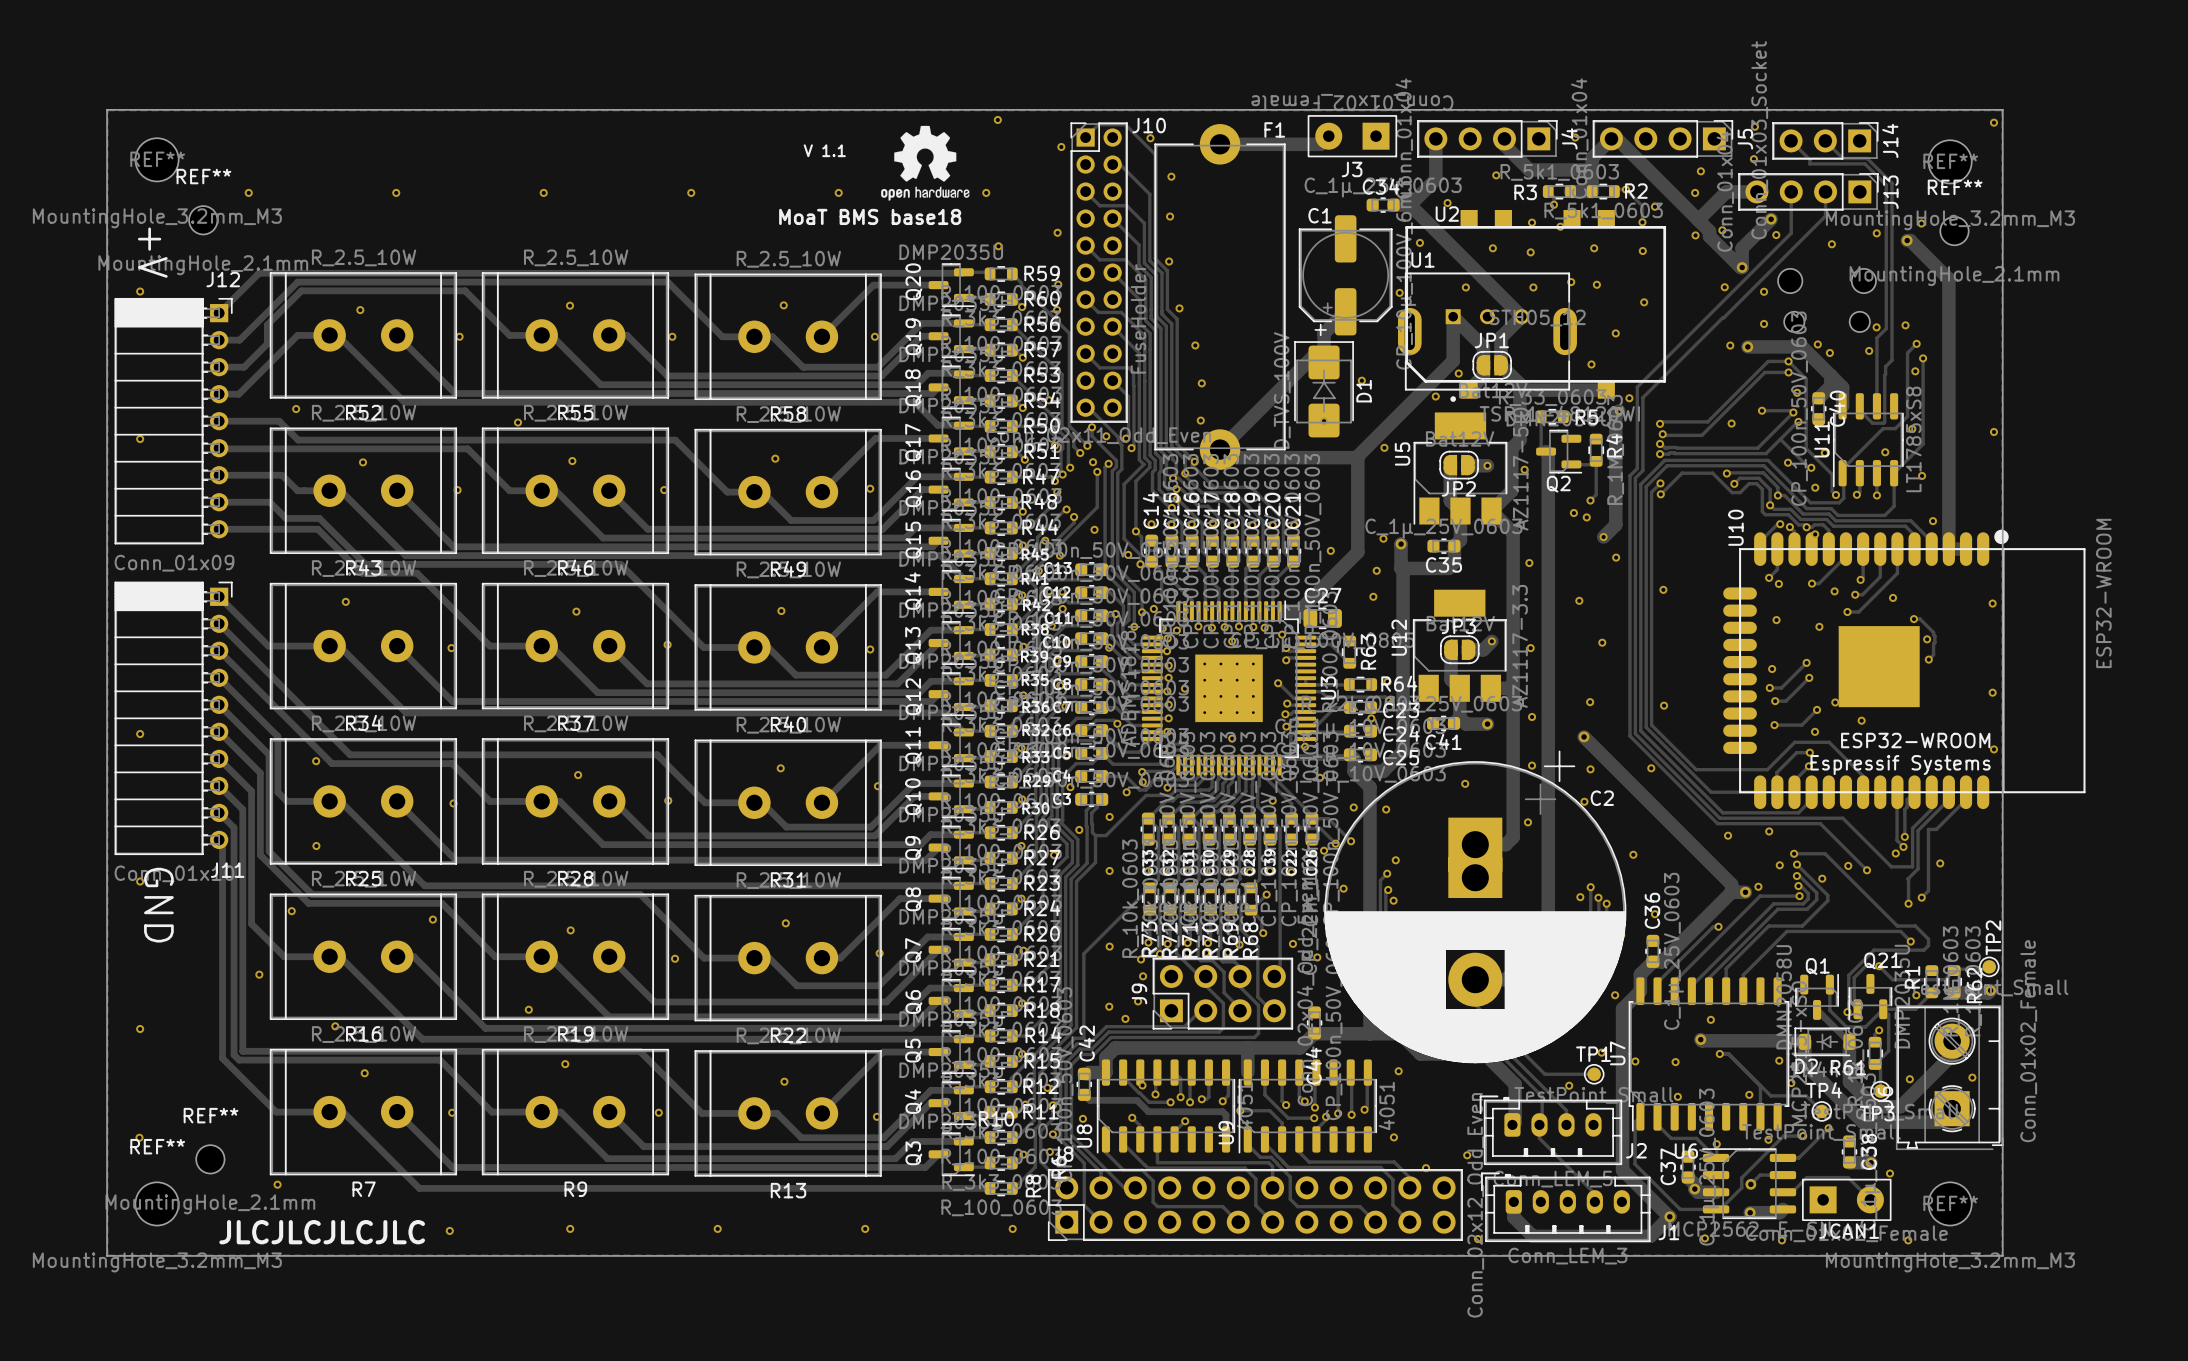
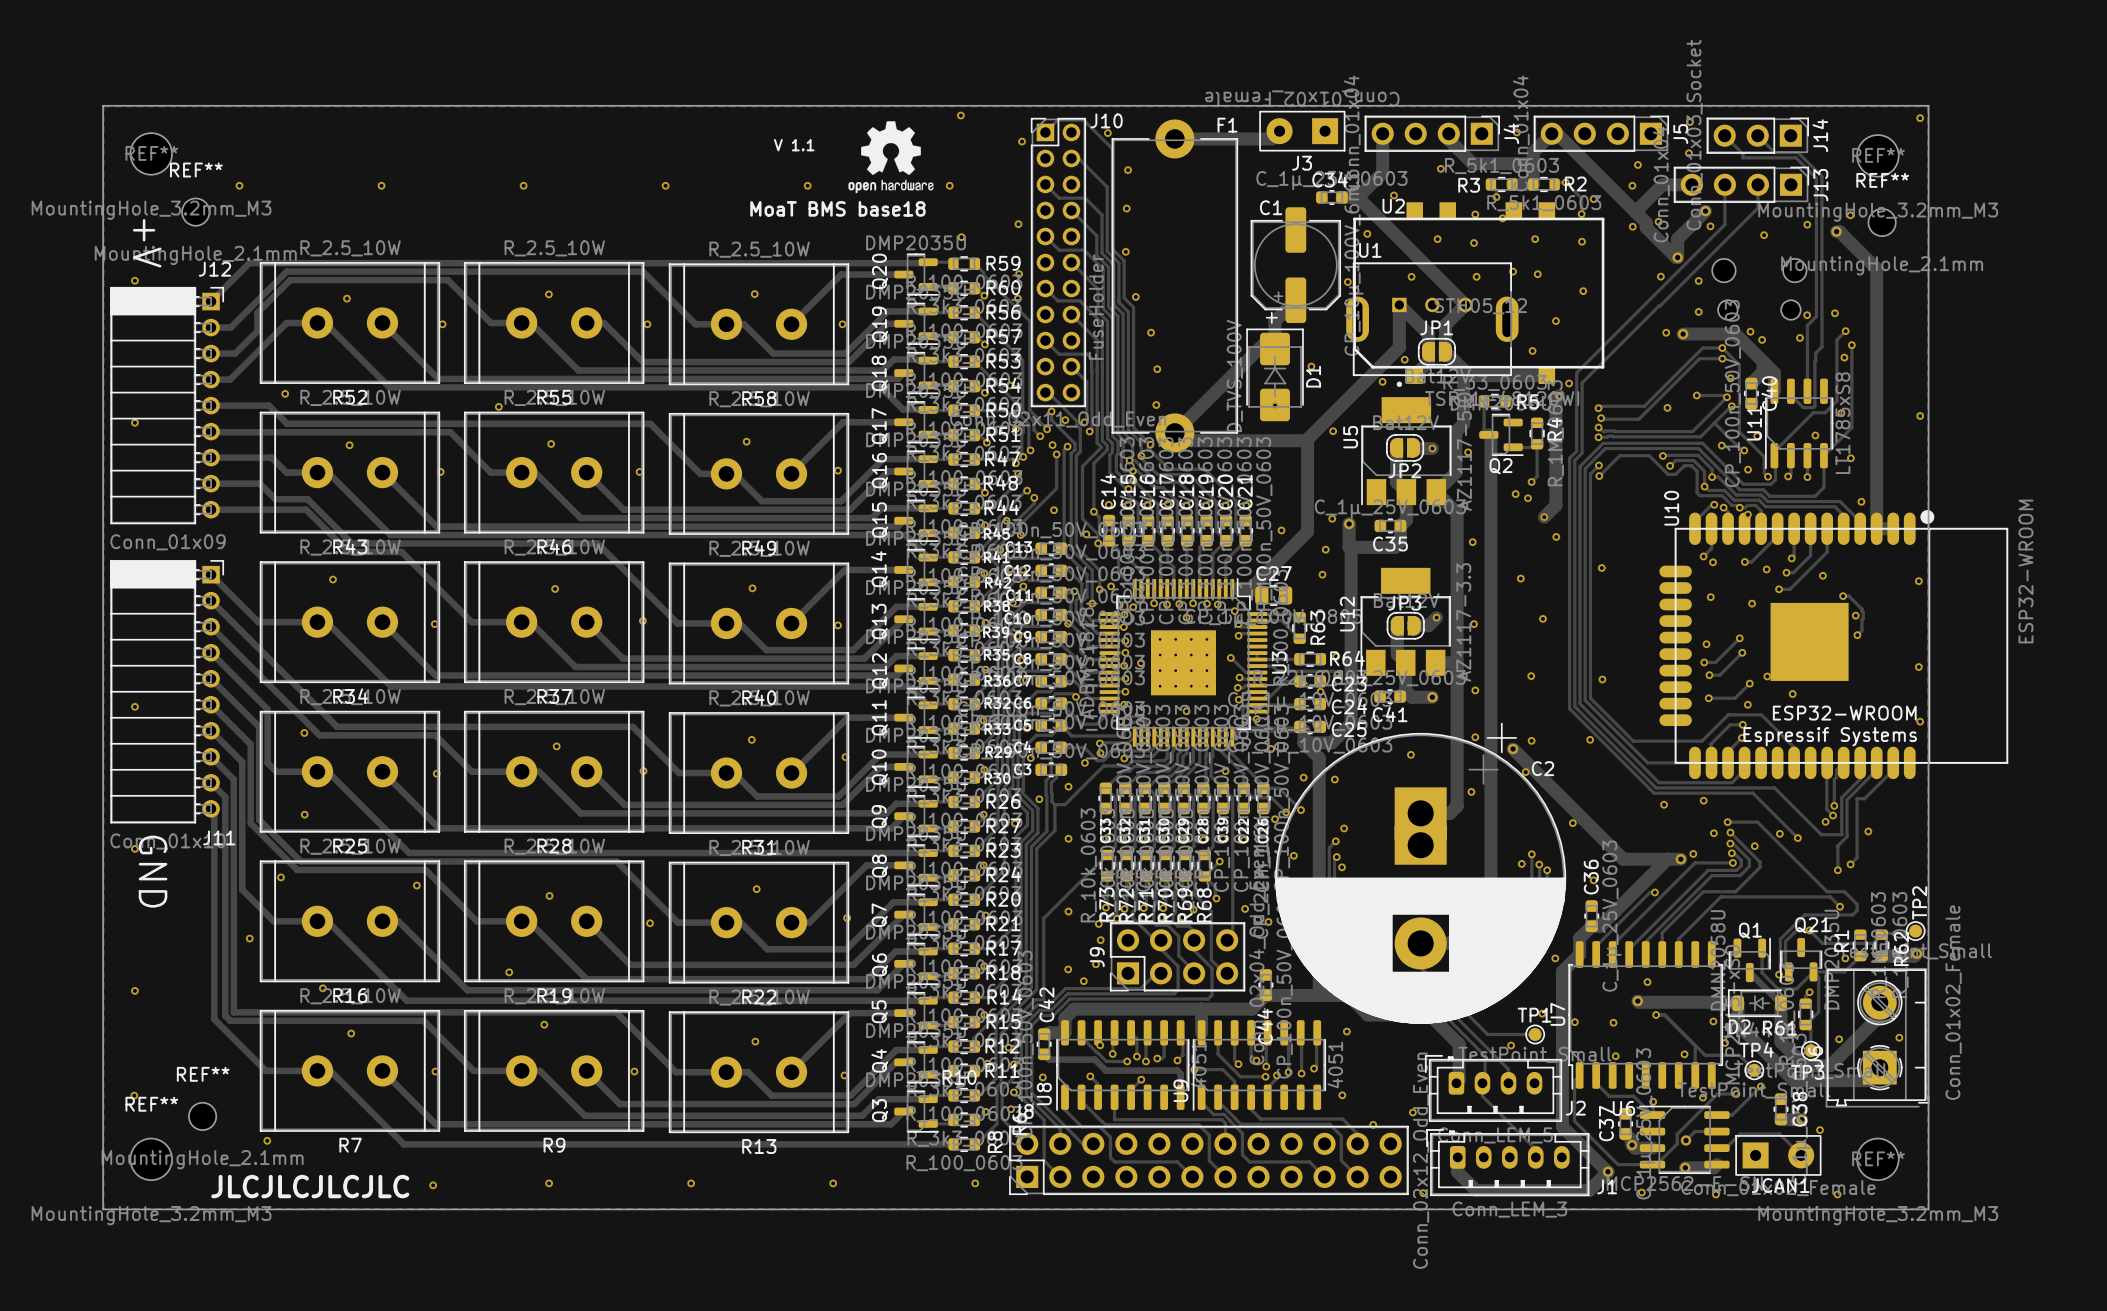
track: (1584, 736) (1731, 884) (1731, 892) -> (1513, 748) (1623, 859) (1667, 859)
via position: (1584, 736) -> (1513, 748)

